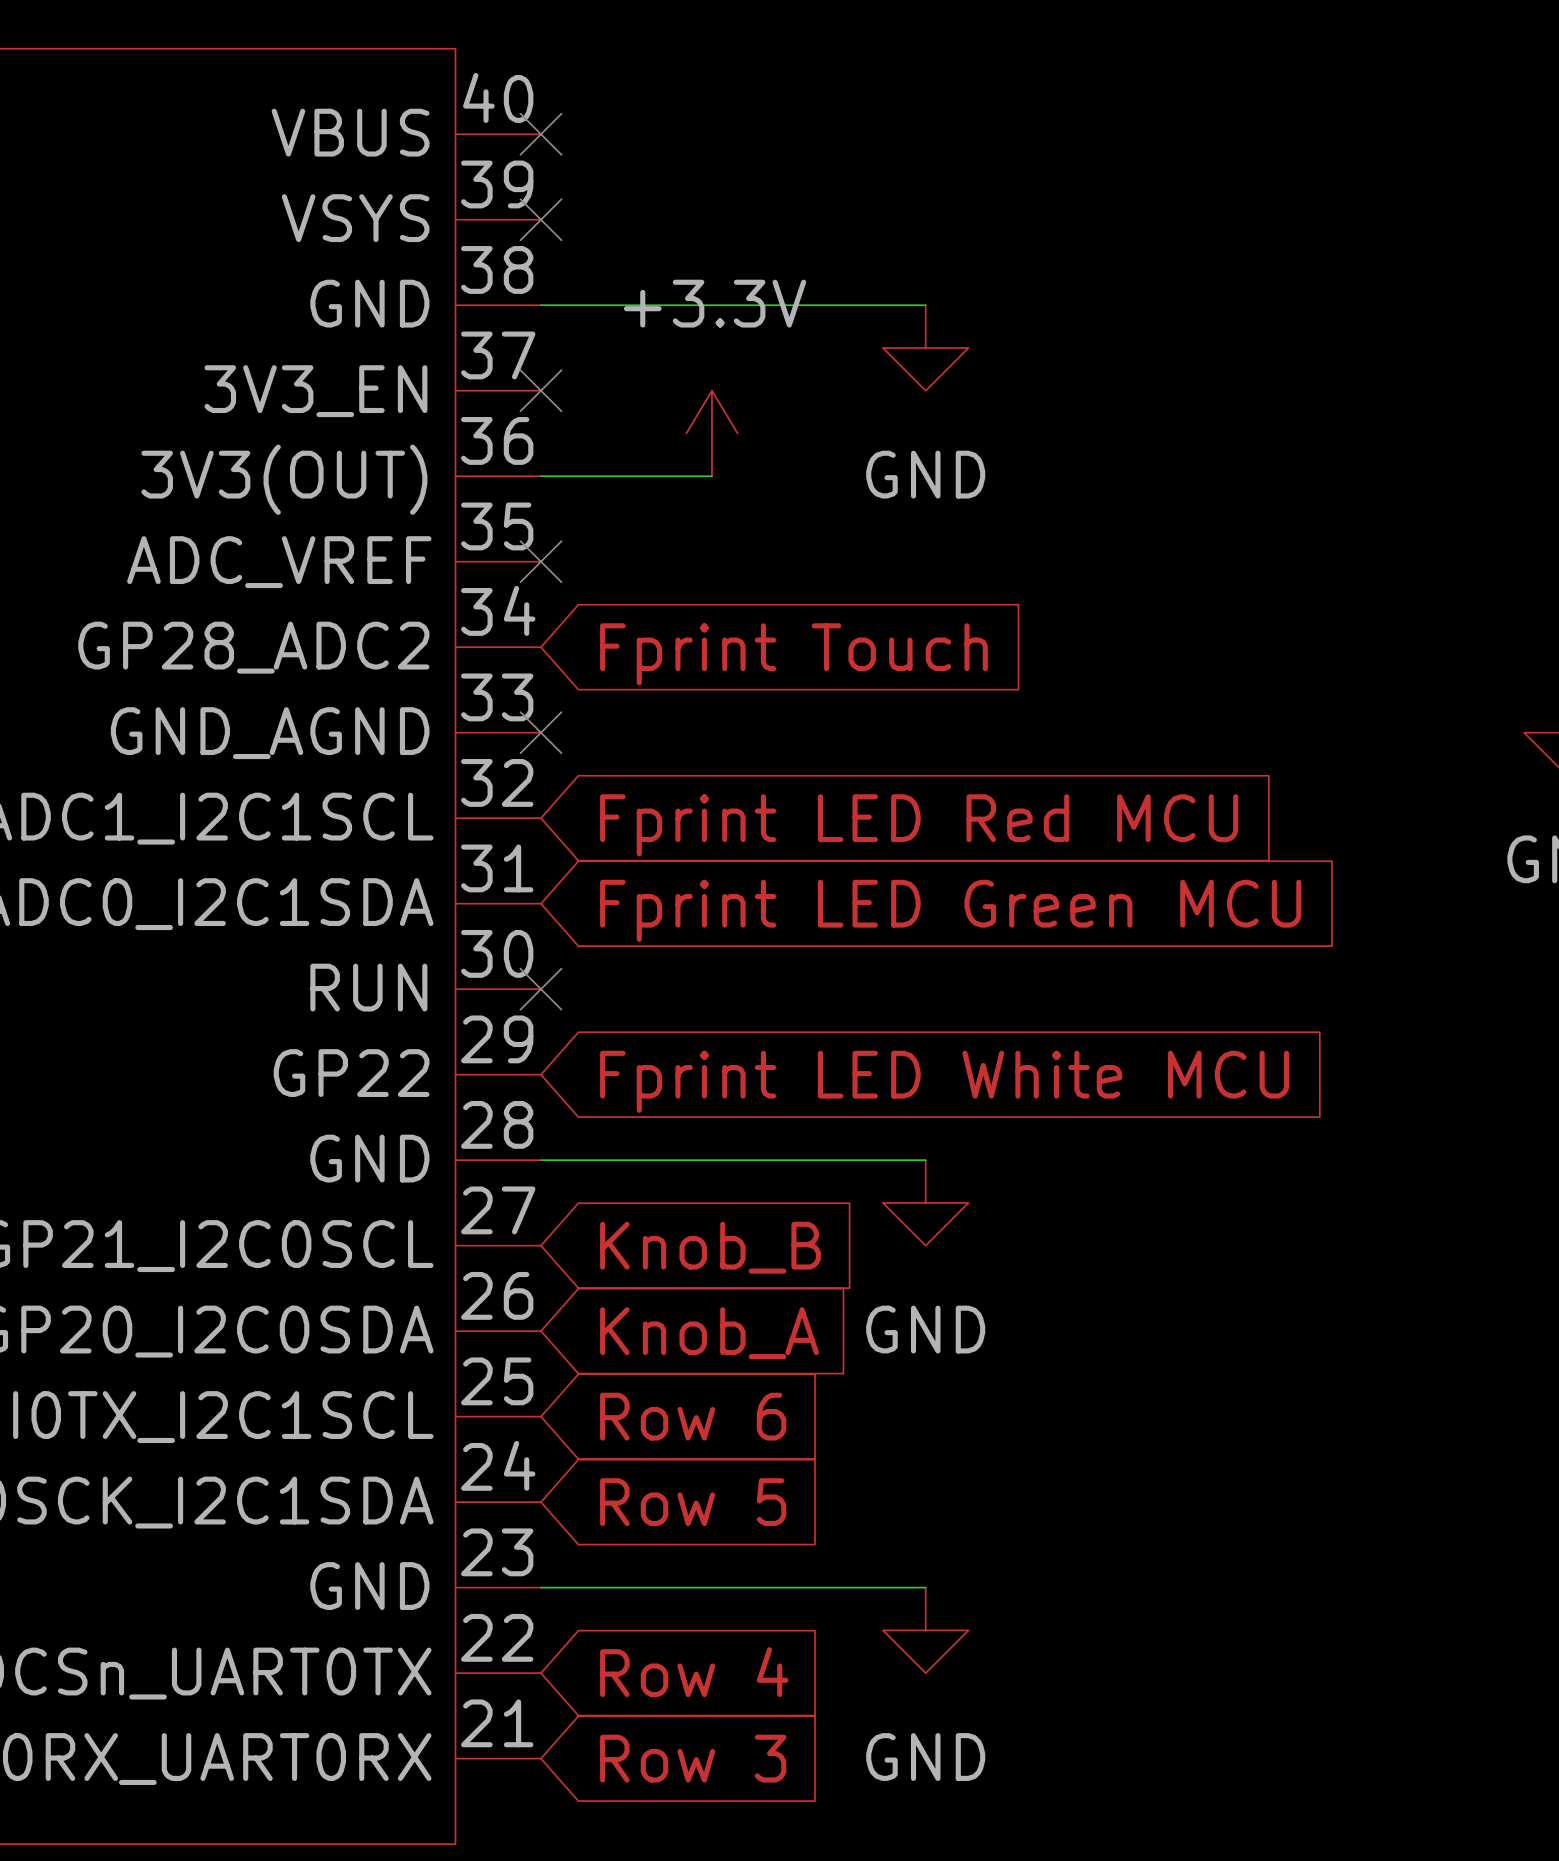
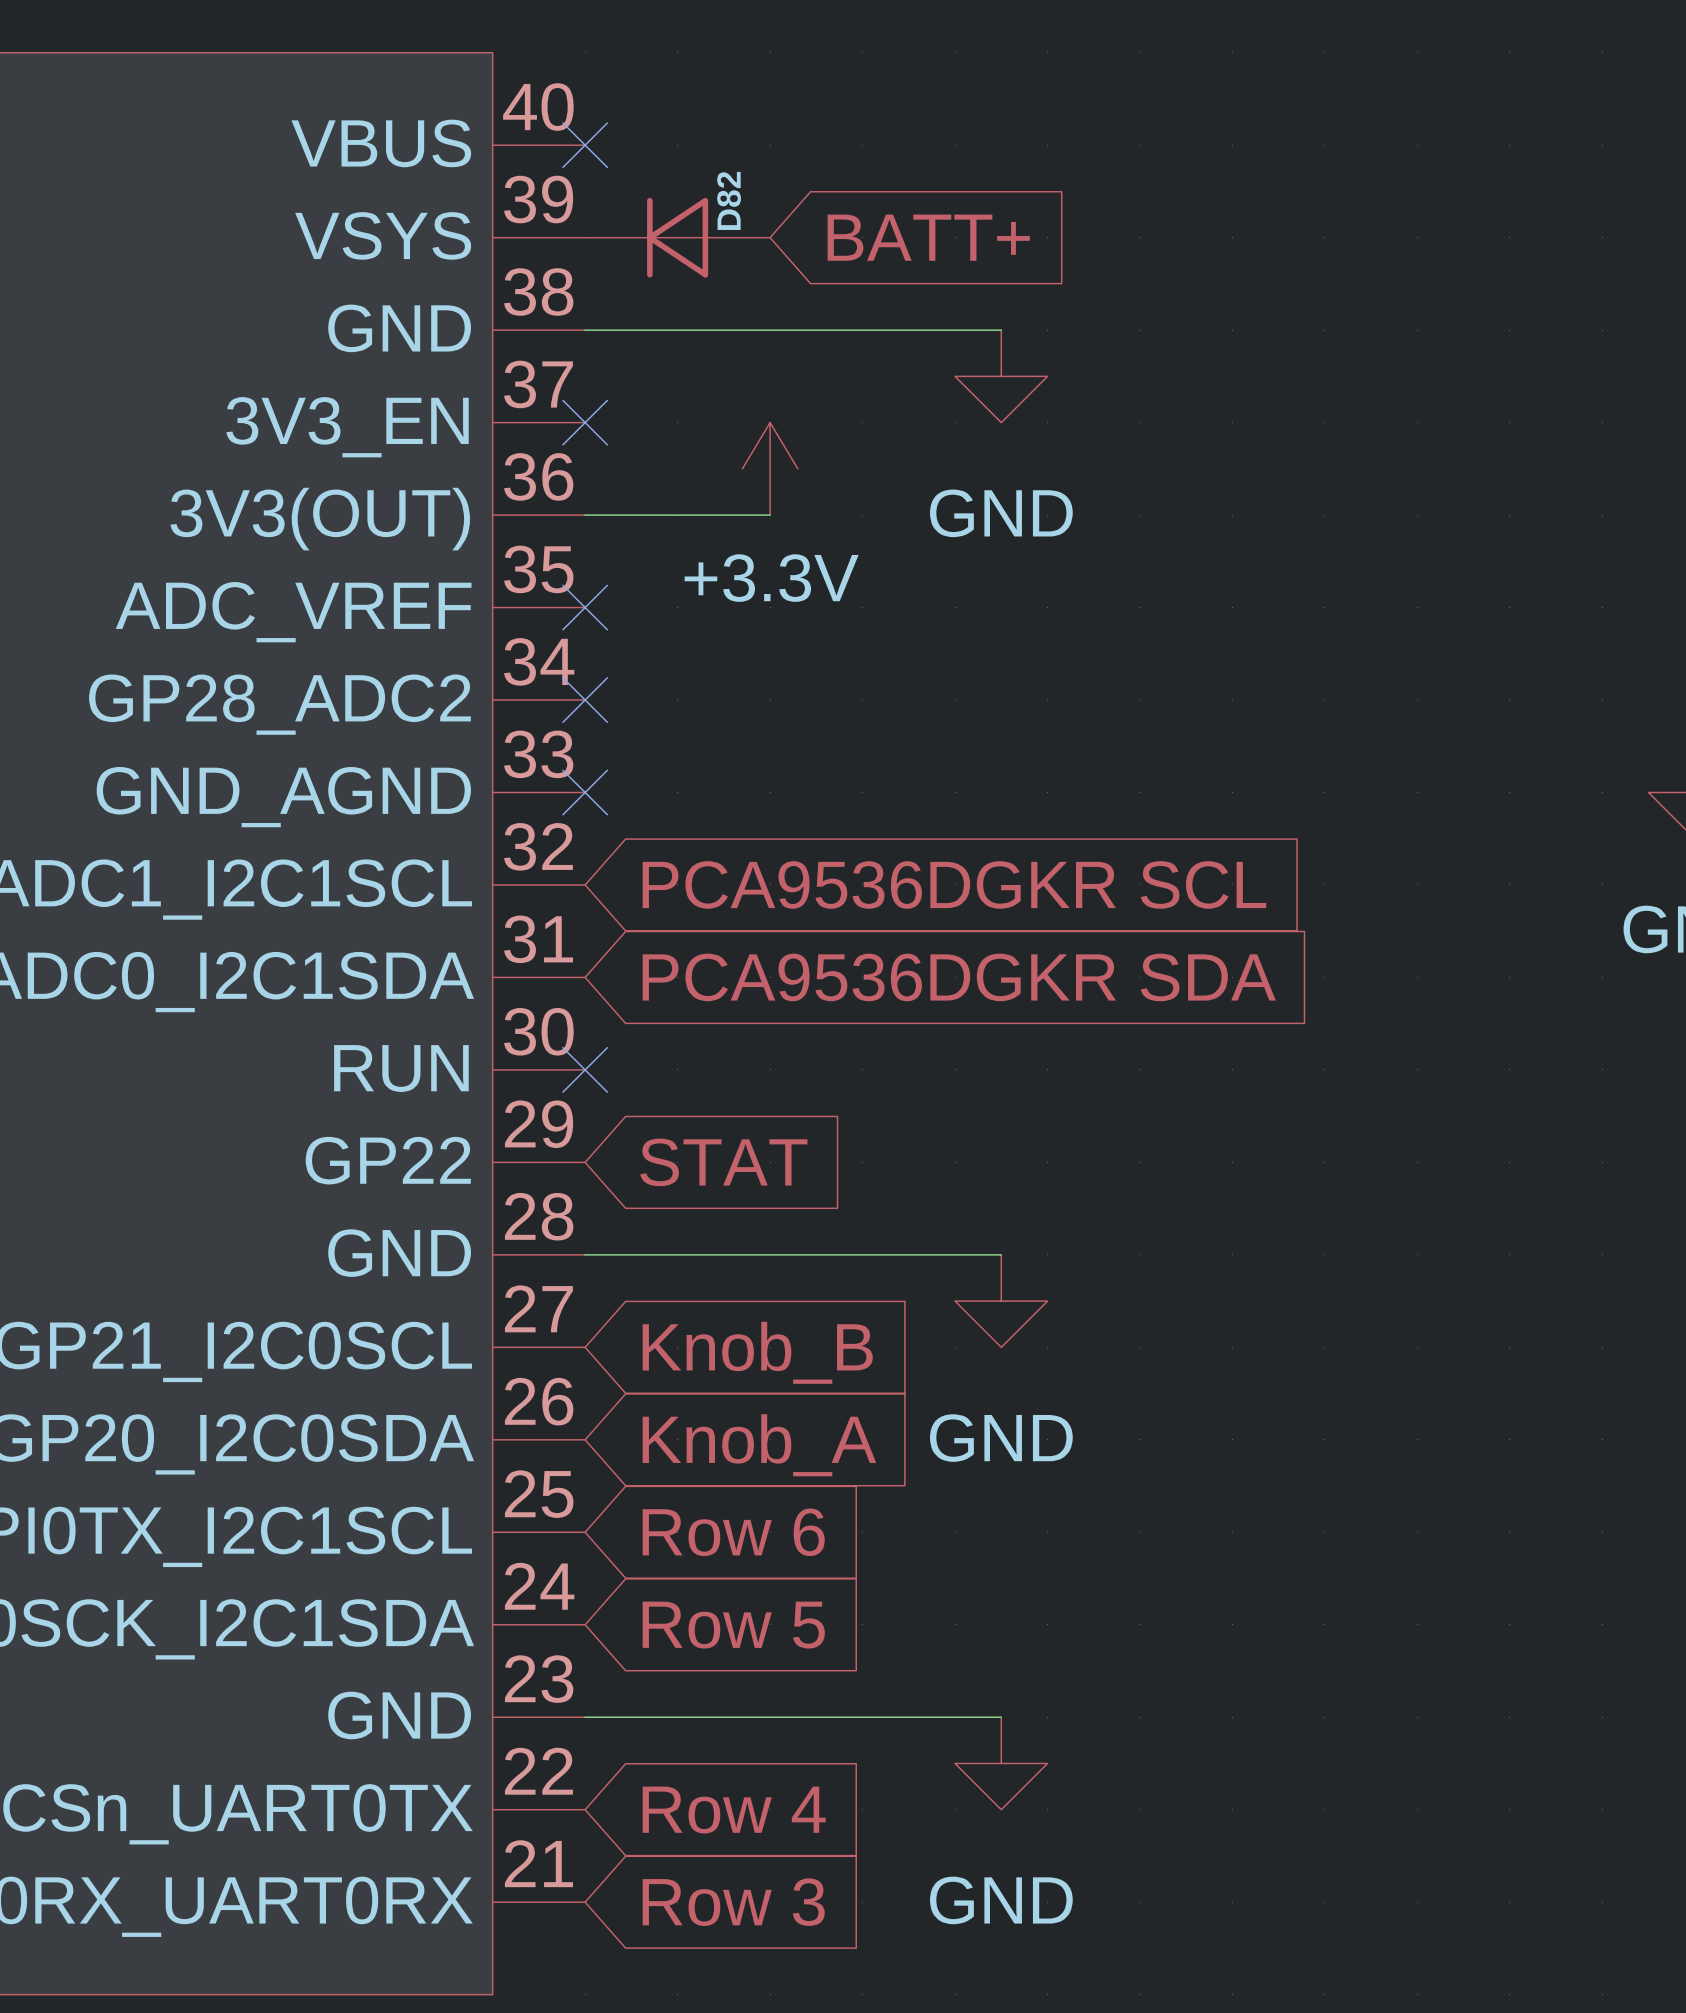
no-connect mark: (540, 219) -> none
D82: none -> (677, 237)
global label: none -> BATT+ (928, 237)
power symbol text position: +3.3V (715, 303) -> +3.3V (771, 578)
no-connect mark: none -> (585, 700)
global label: Fprint Touch (793, 654) -> none
global label: Fprint LED Red MCU (919, 825) -> PCA9536DGKR SCL (954, 884)
global label: Fprint LED Green MCU (950, 910) -> PCA9536DGKR SDA (959, 977)
global label: Fprint LED White MCU (944, 1081) -> STAT (723, 1162)

